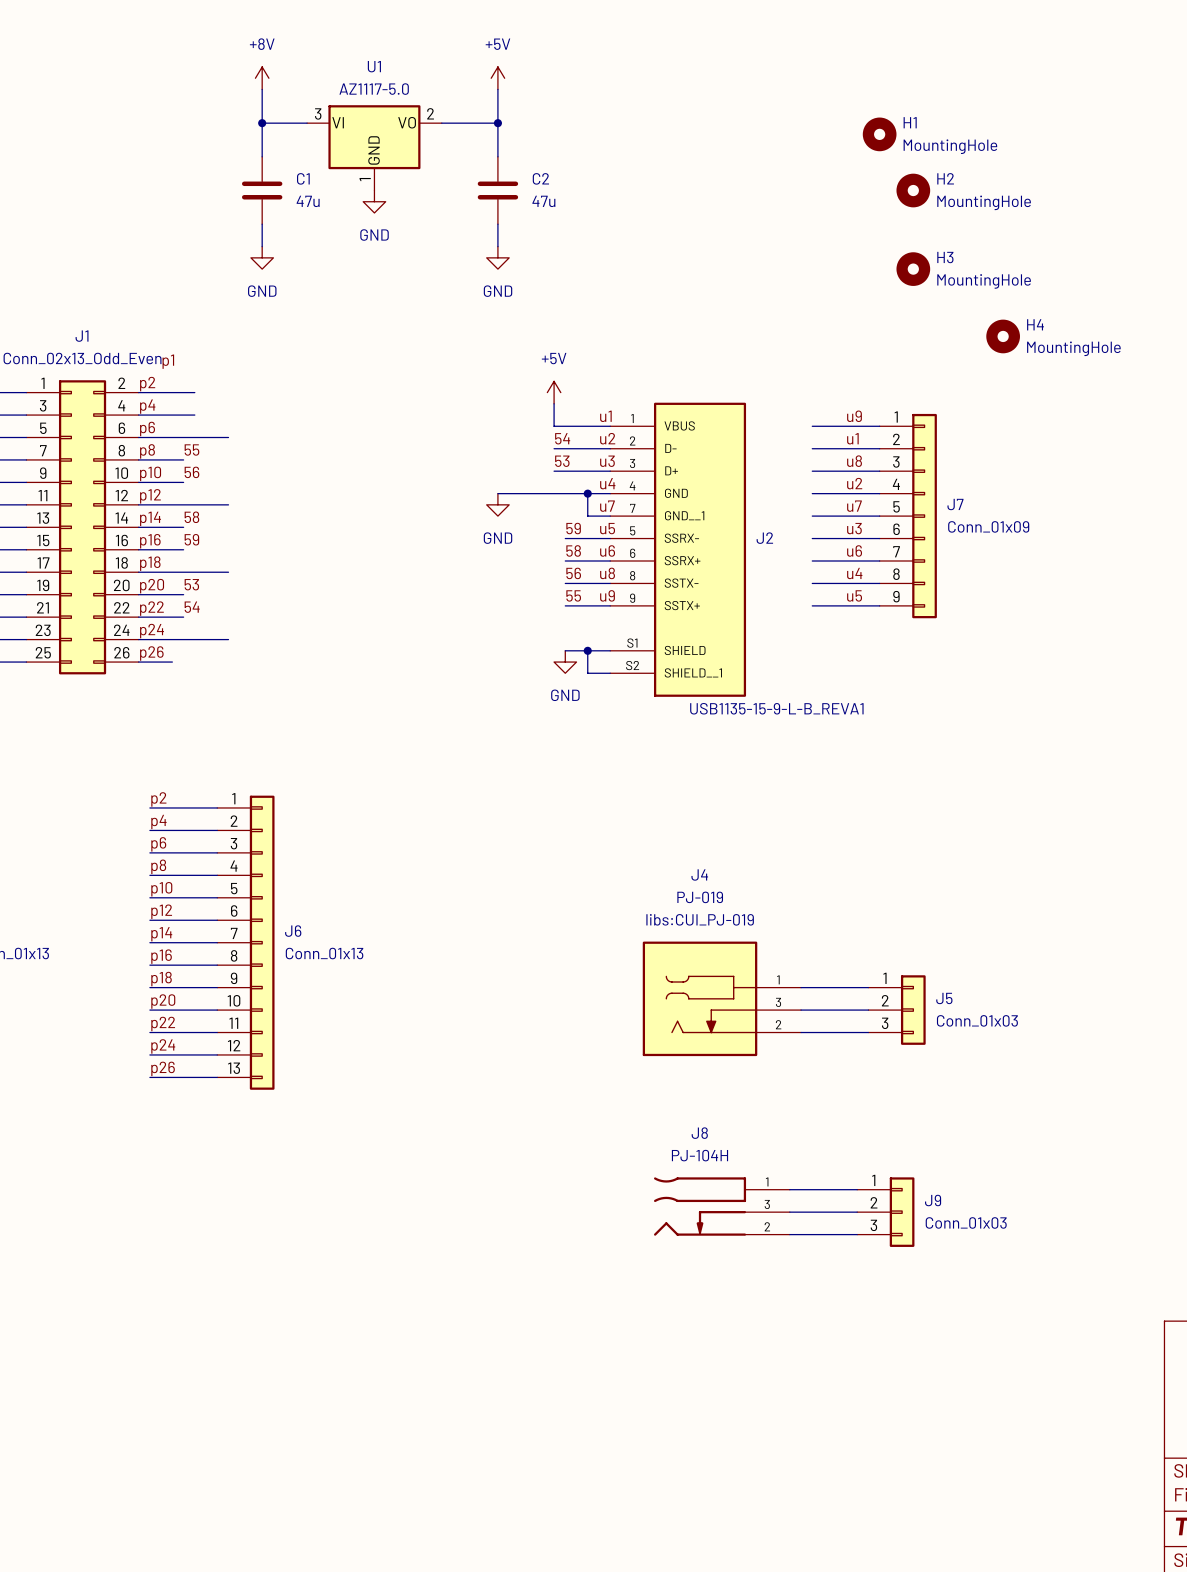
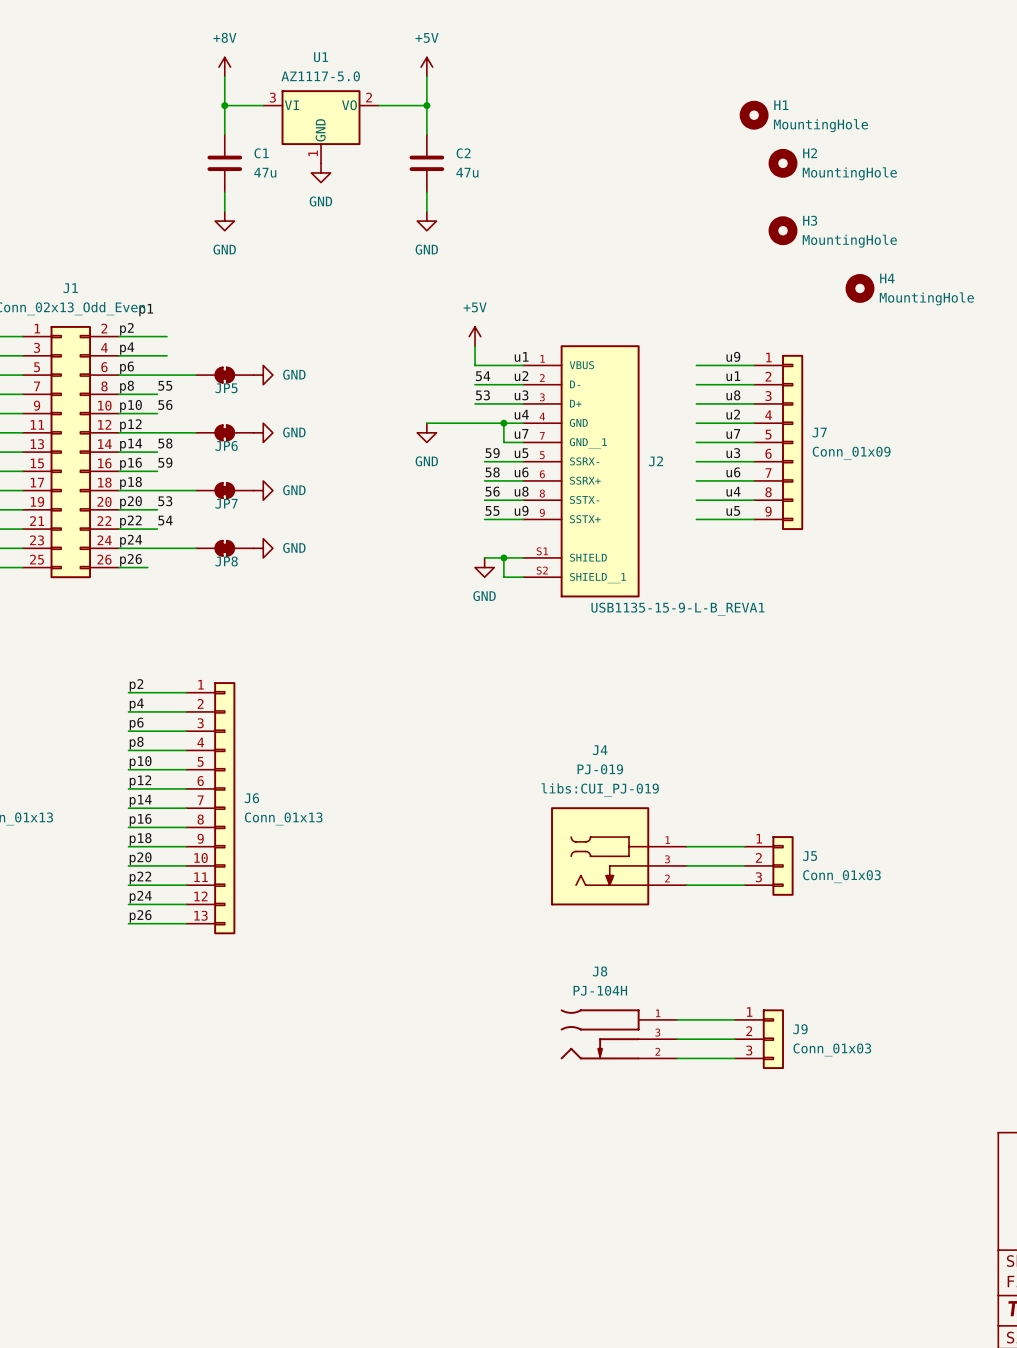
JP5: none -> (224, 375)
power symbol: none -> GND (263, 375)
JP6: none -> (224, 432)
power symbol: none -> GND (263, 432)
JP7: none -> (224, 490)
power symbol: none -> GND (263, 490)
JP8: none -> (224, 548)
power symbol: none -> GND (263, 548)

